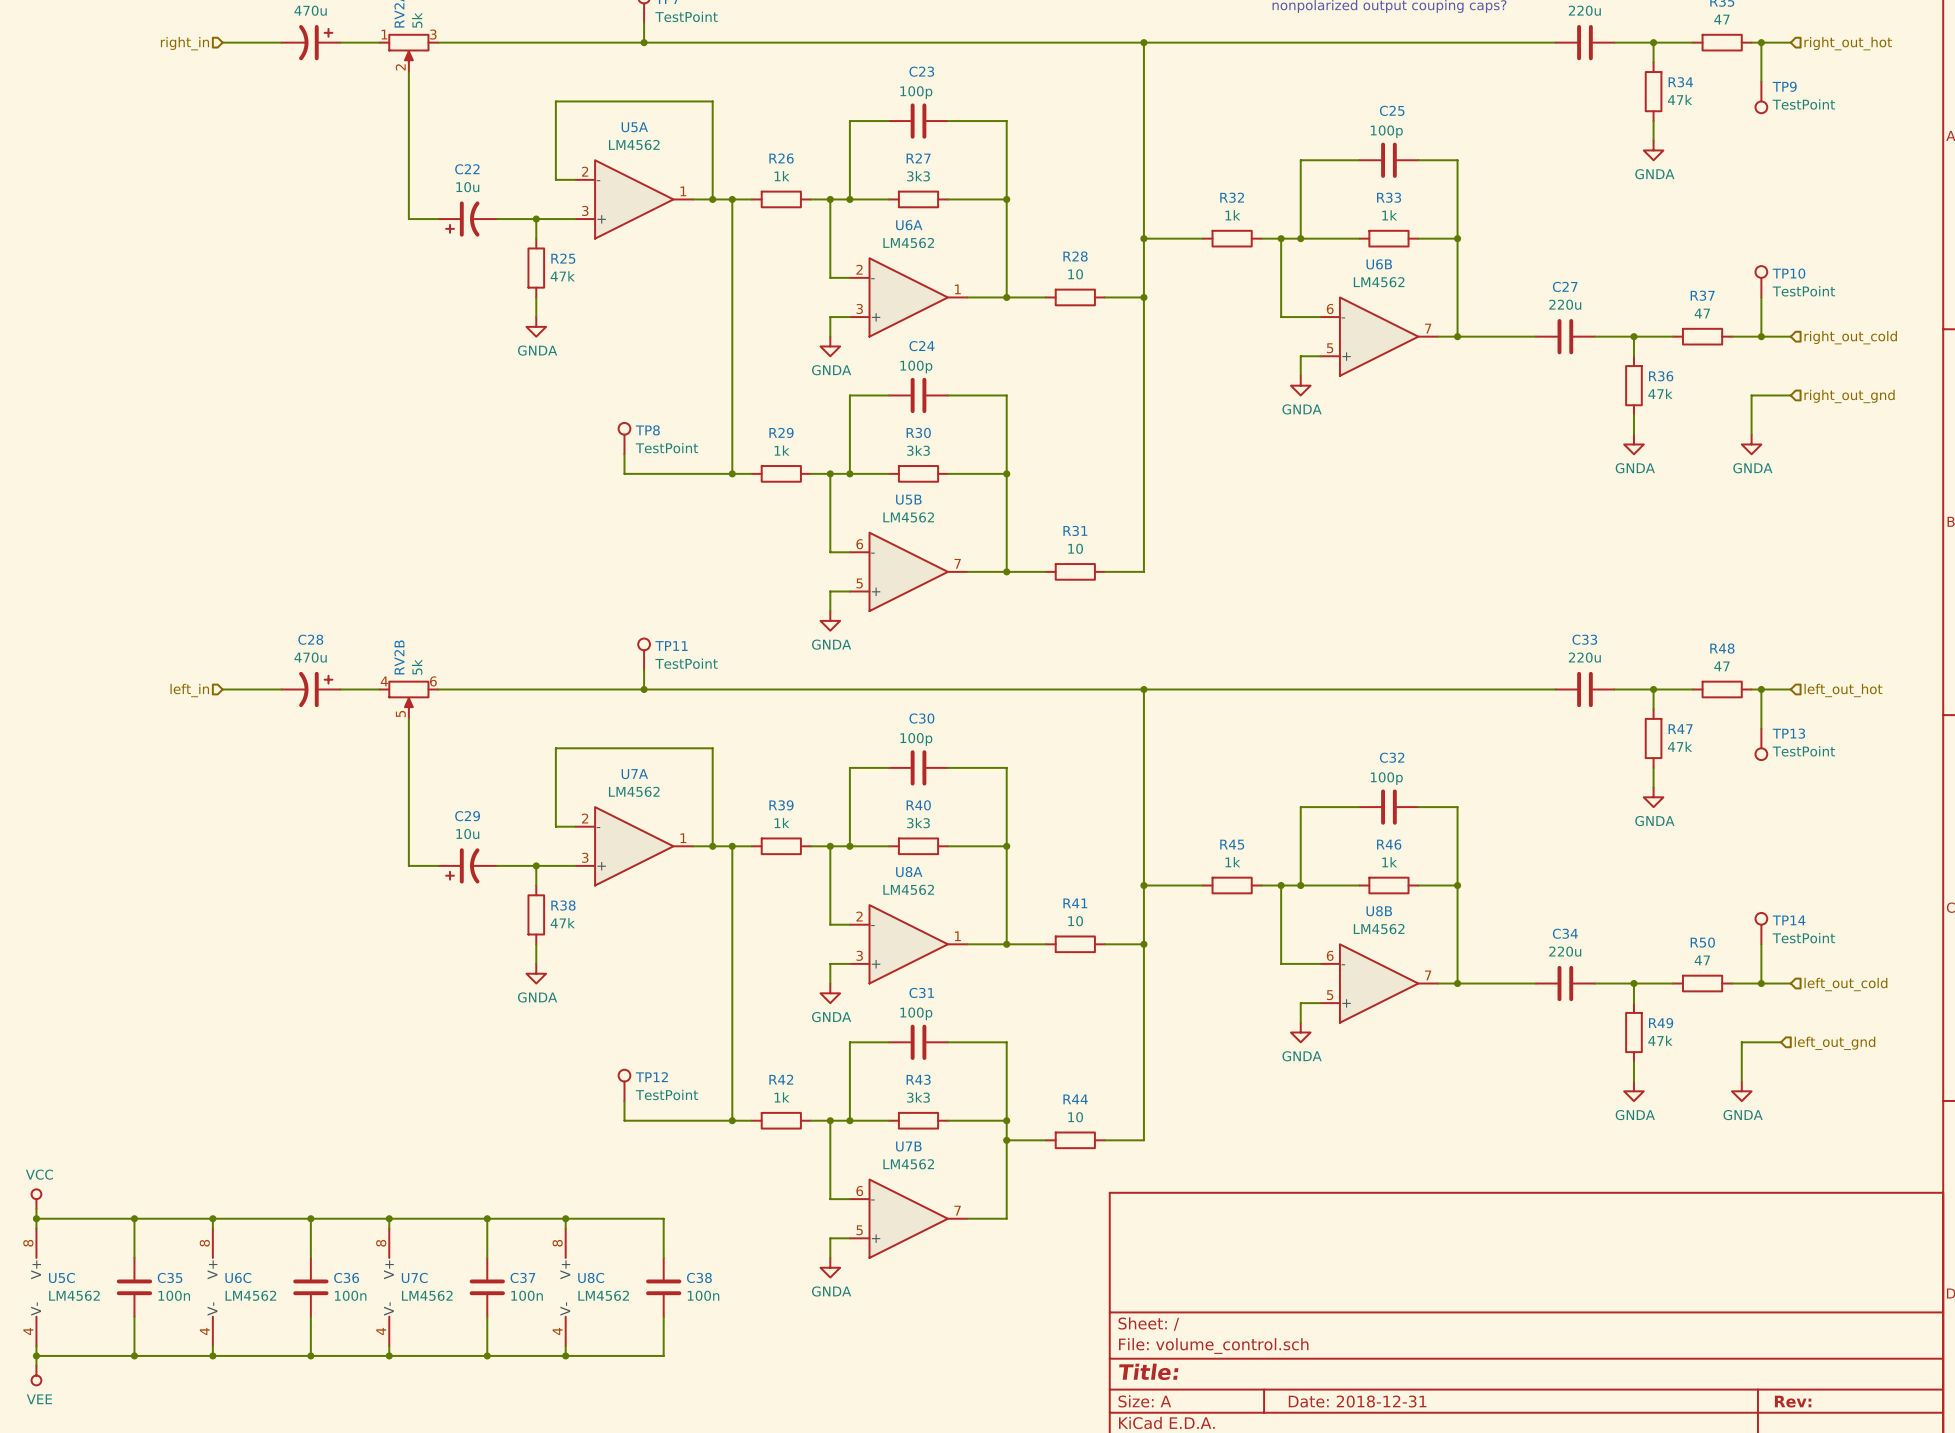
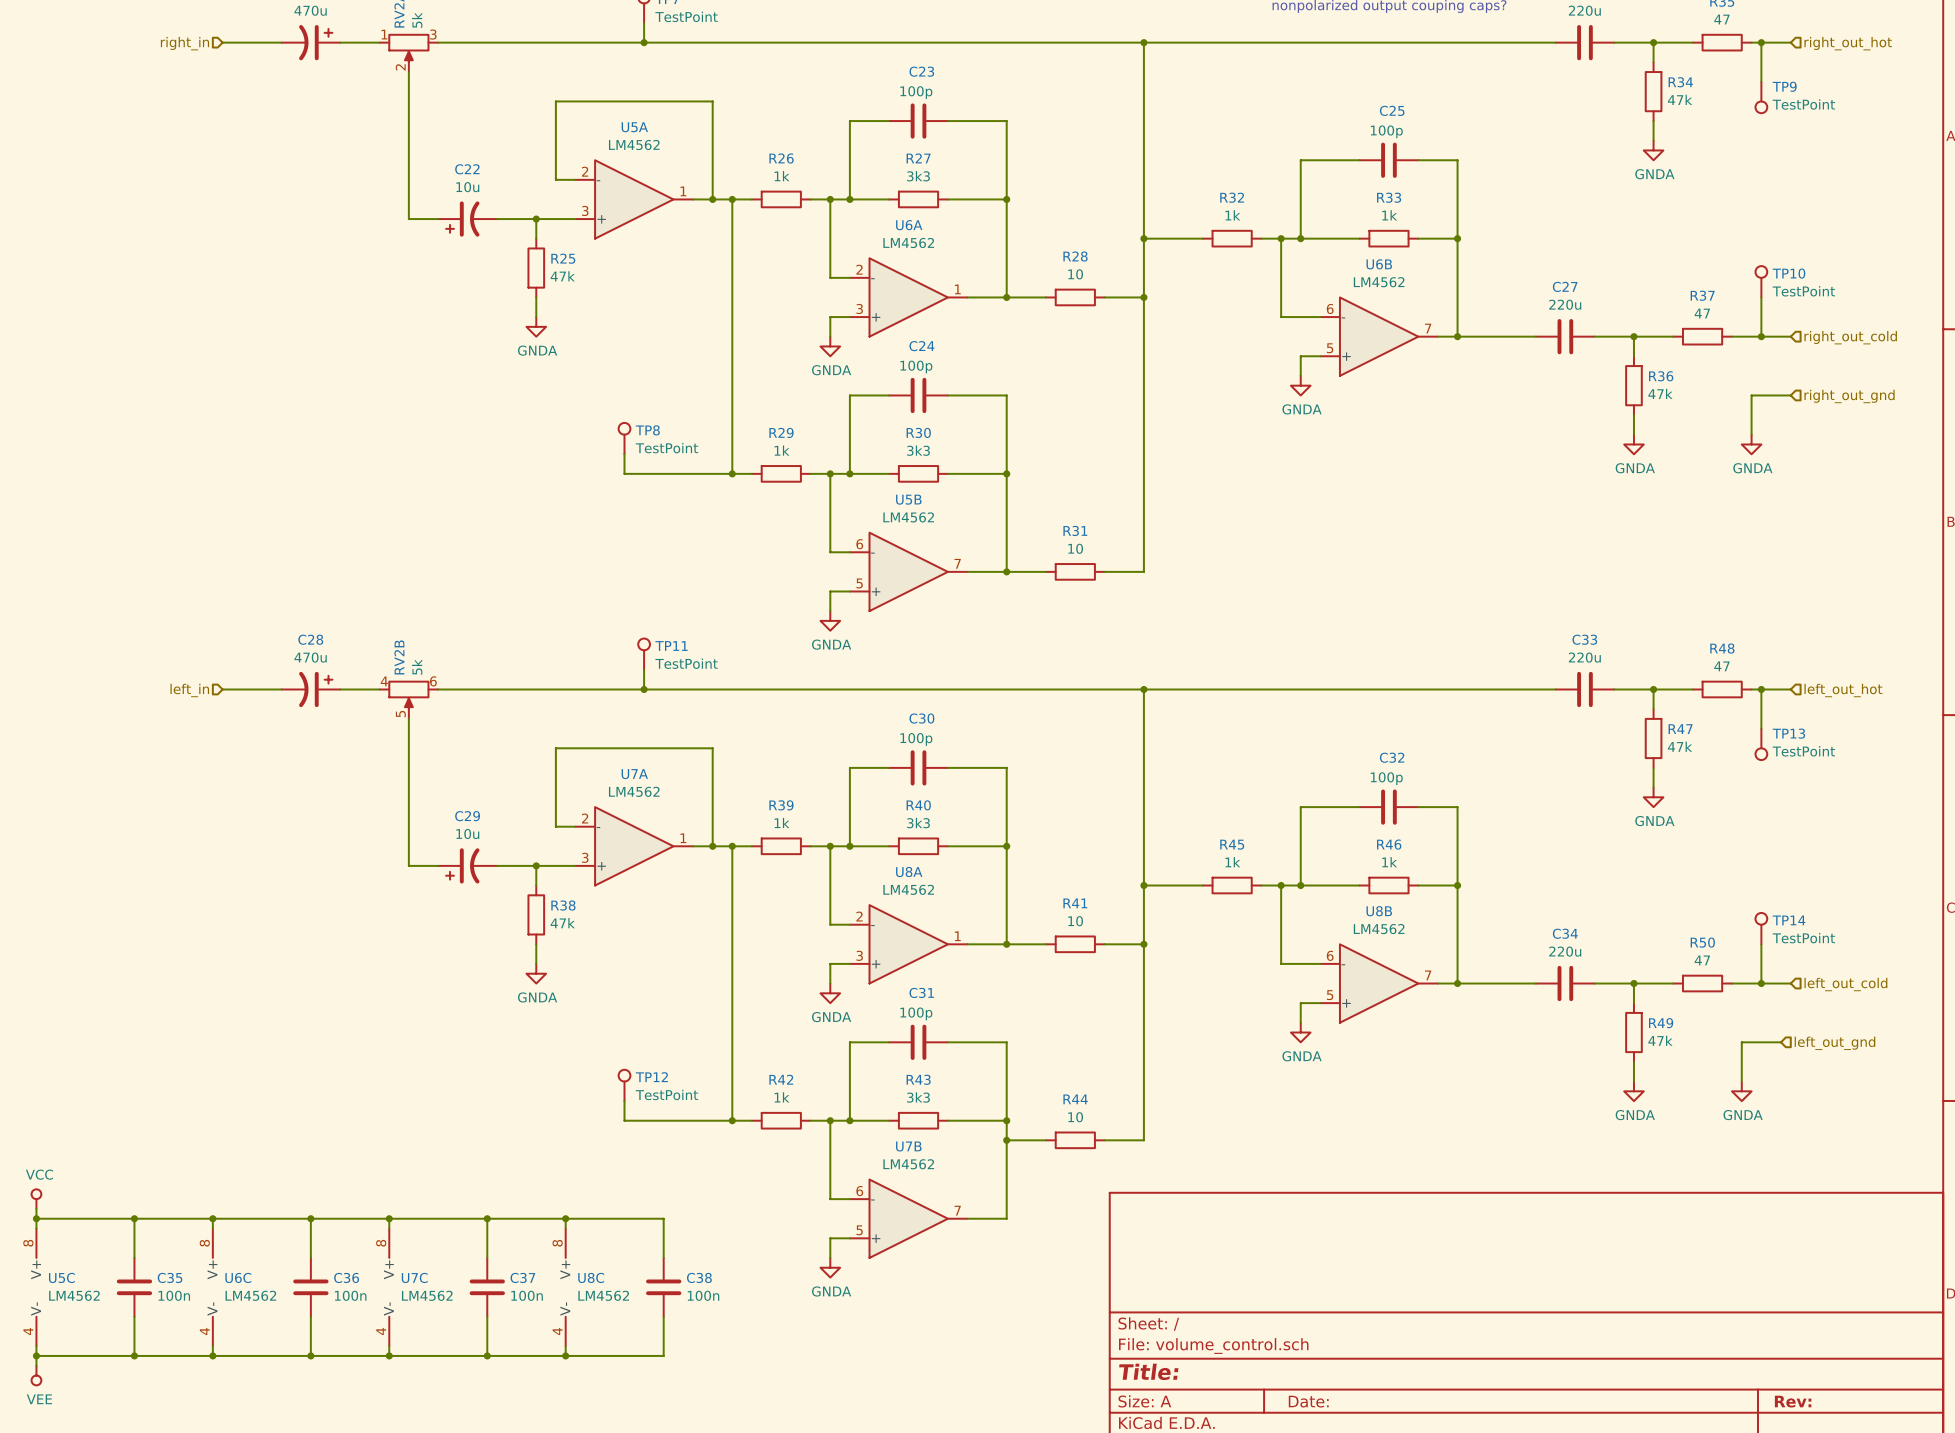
title block: Date: 2018-12-31 (1357, 1401) -> Date: (1308, 1401)

